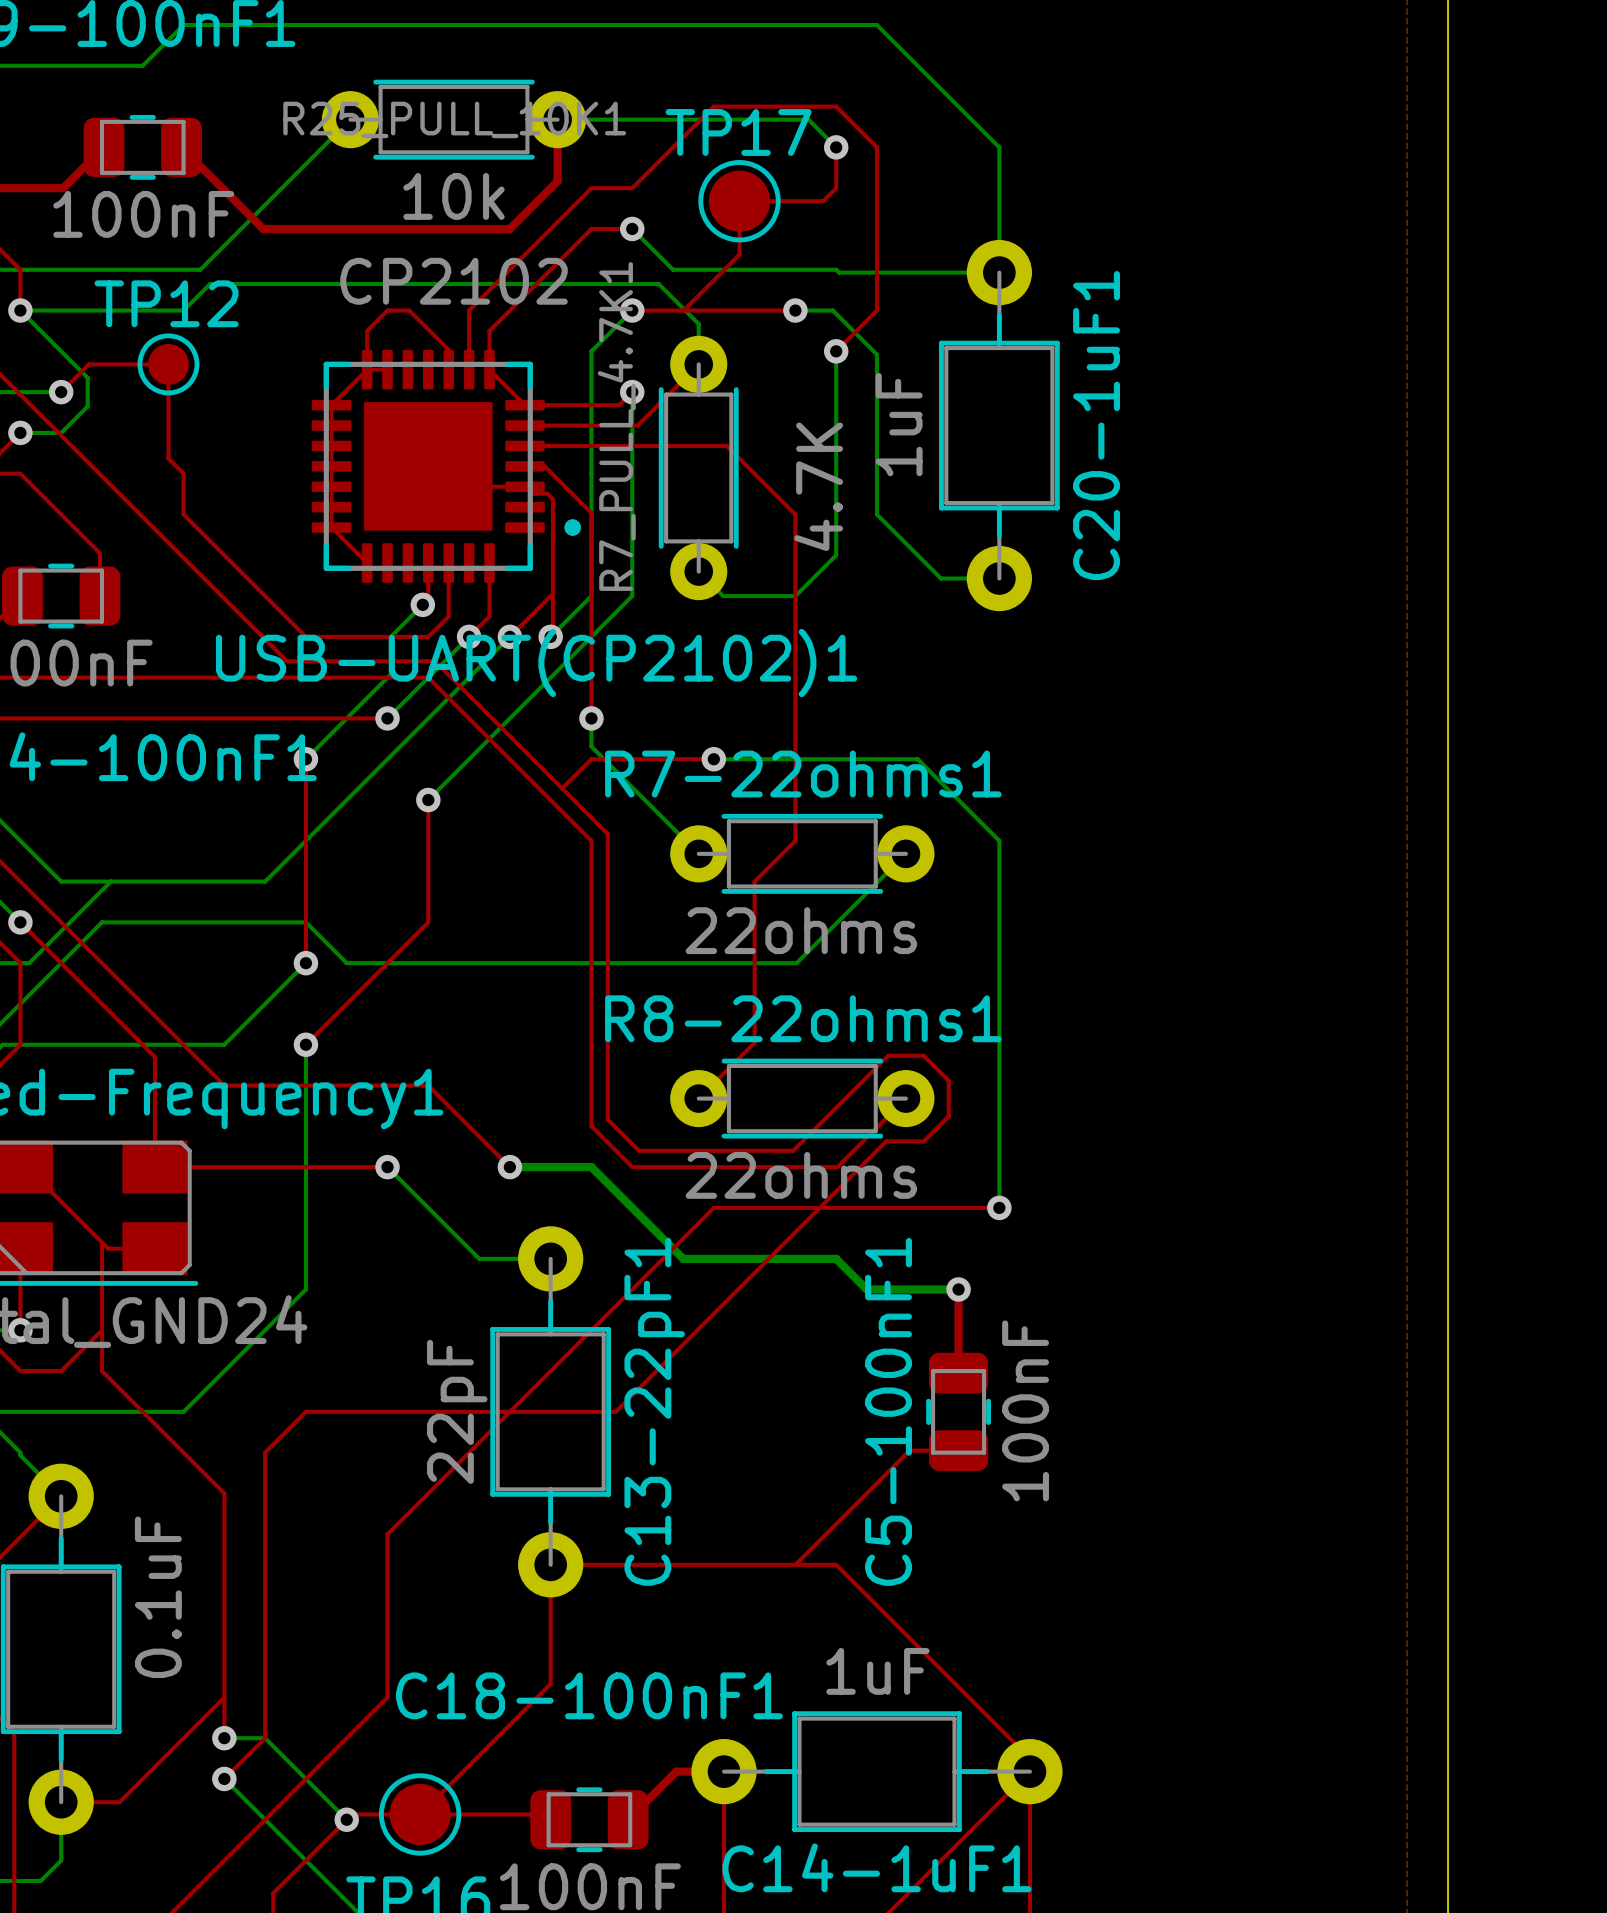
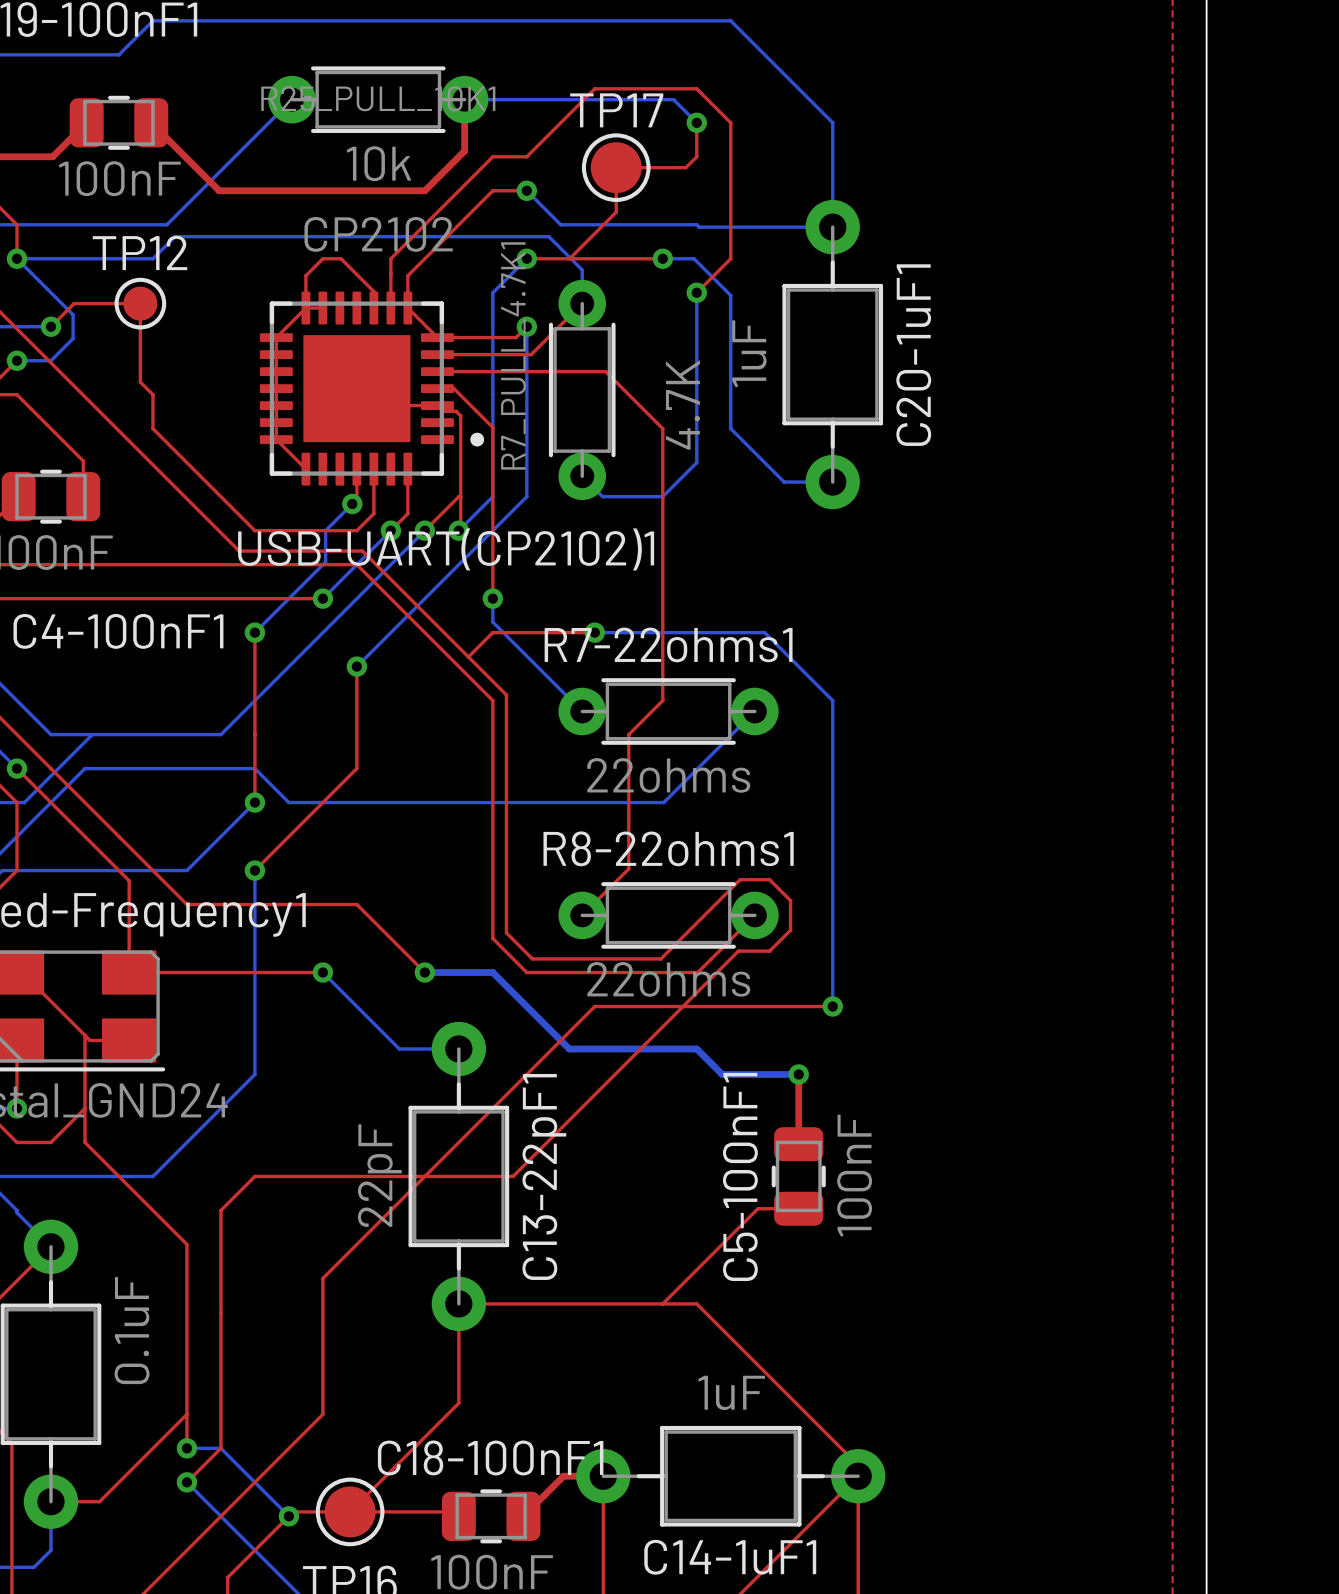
C18-100nF1 name position: C18-100nF1 (589, 1695) -> C18-100nF1 (490, 1457)

